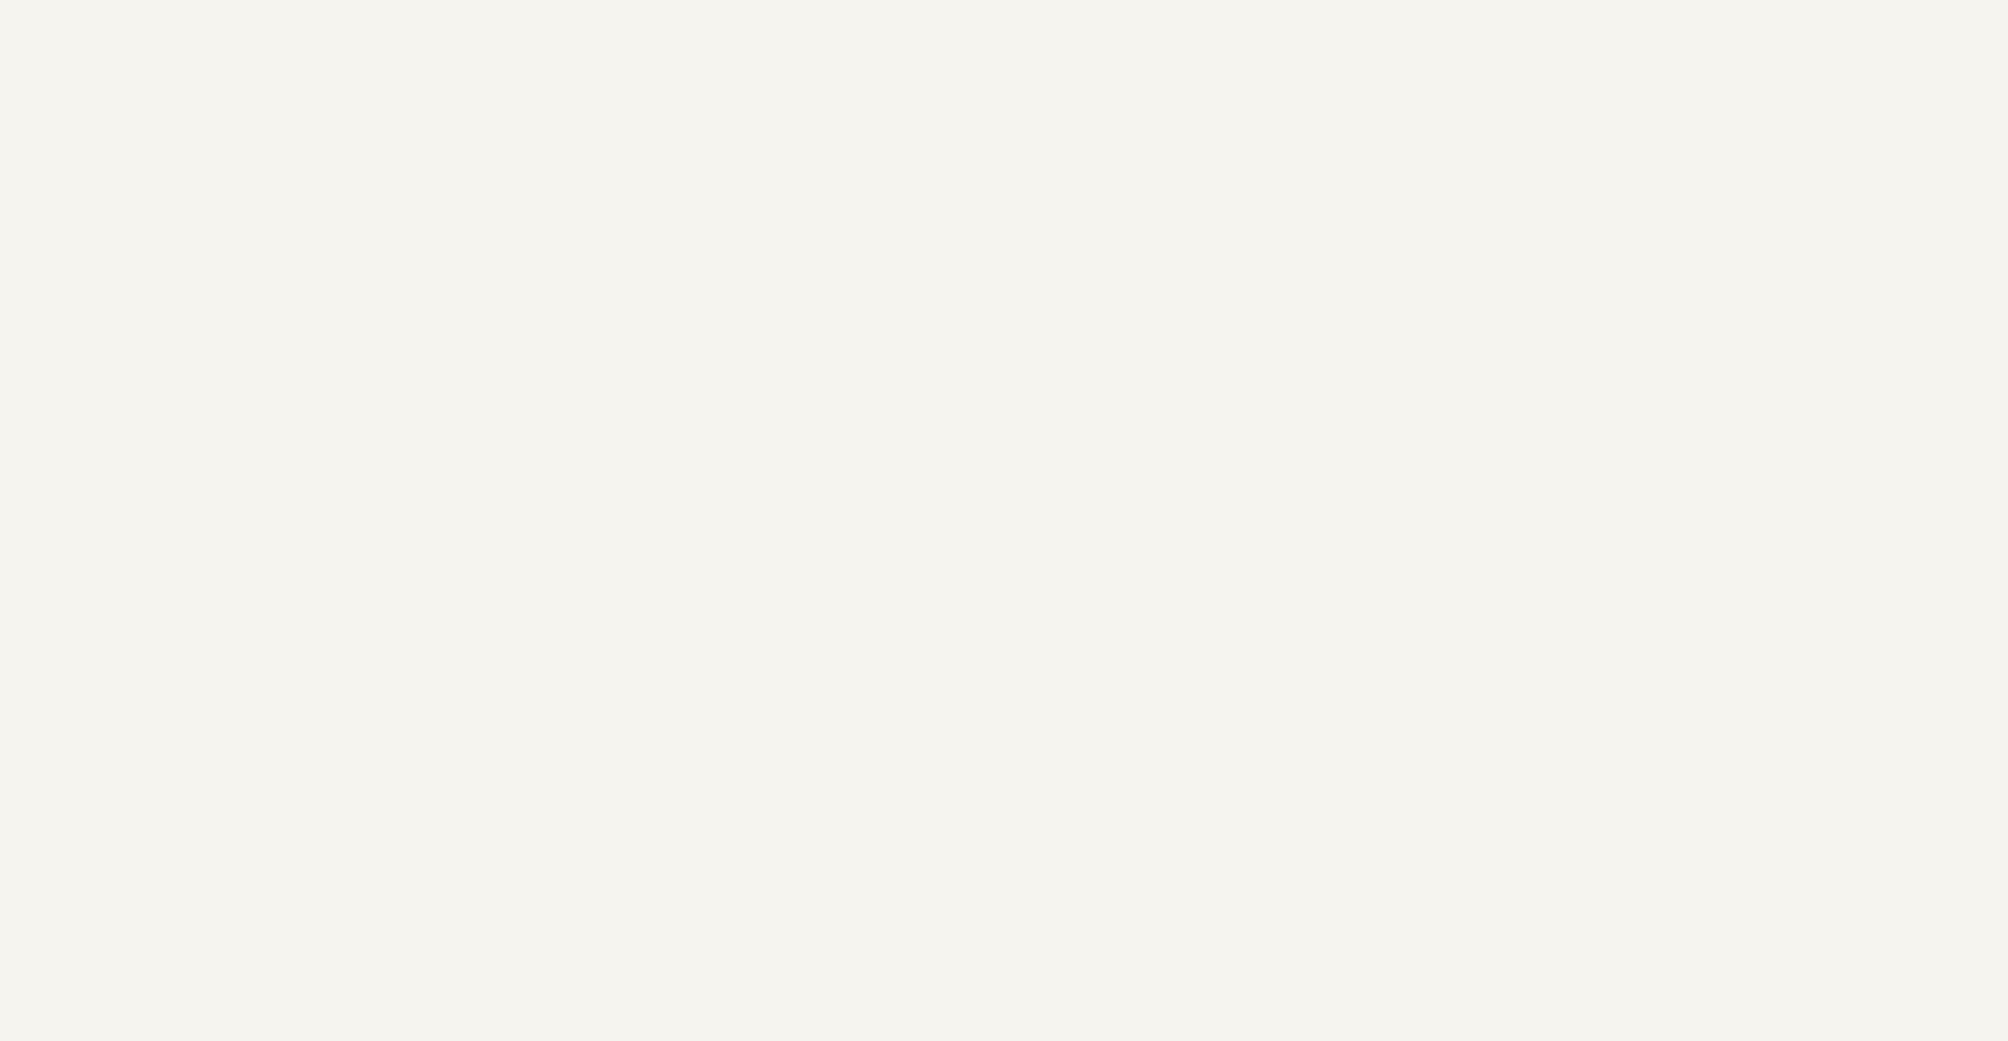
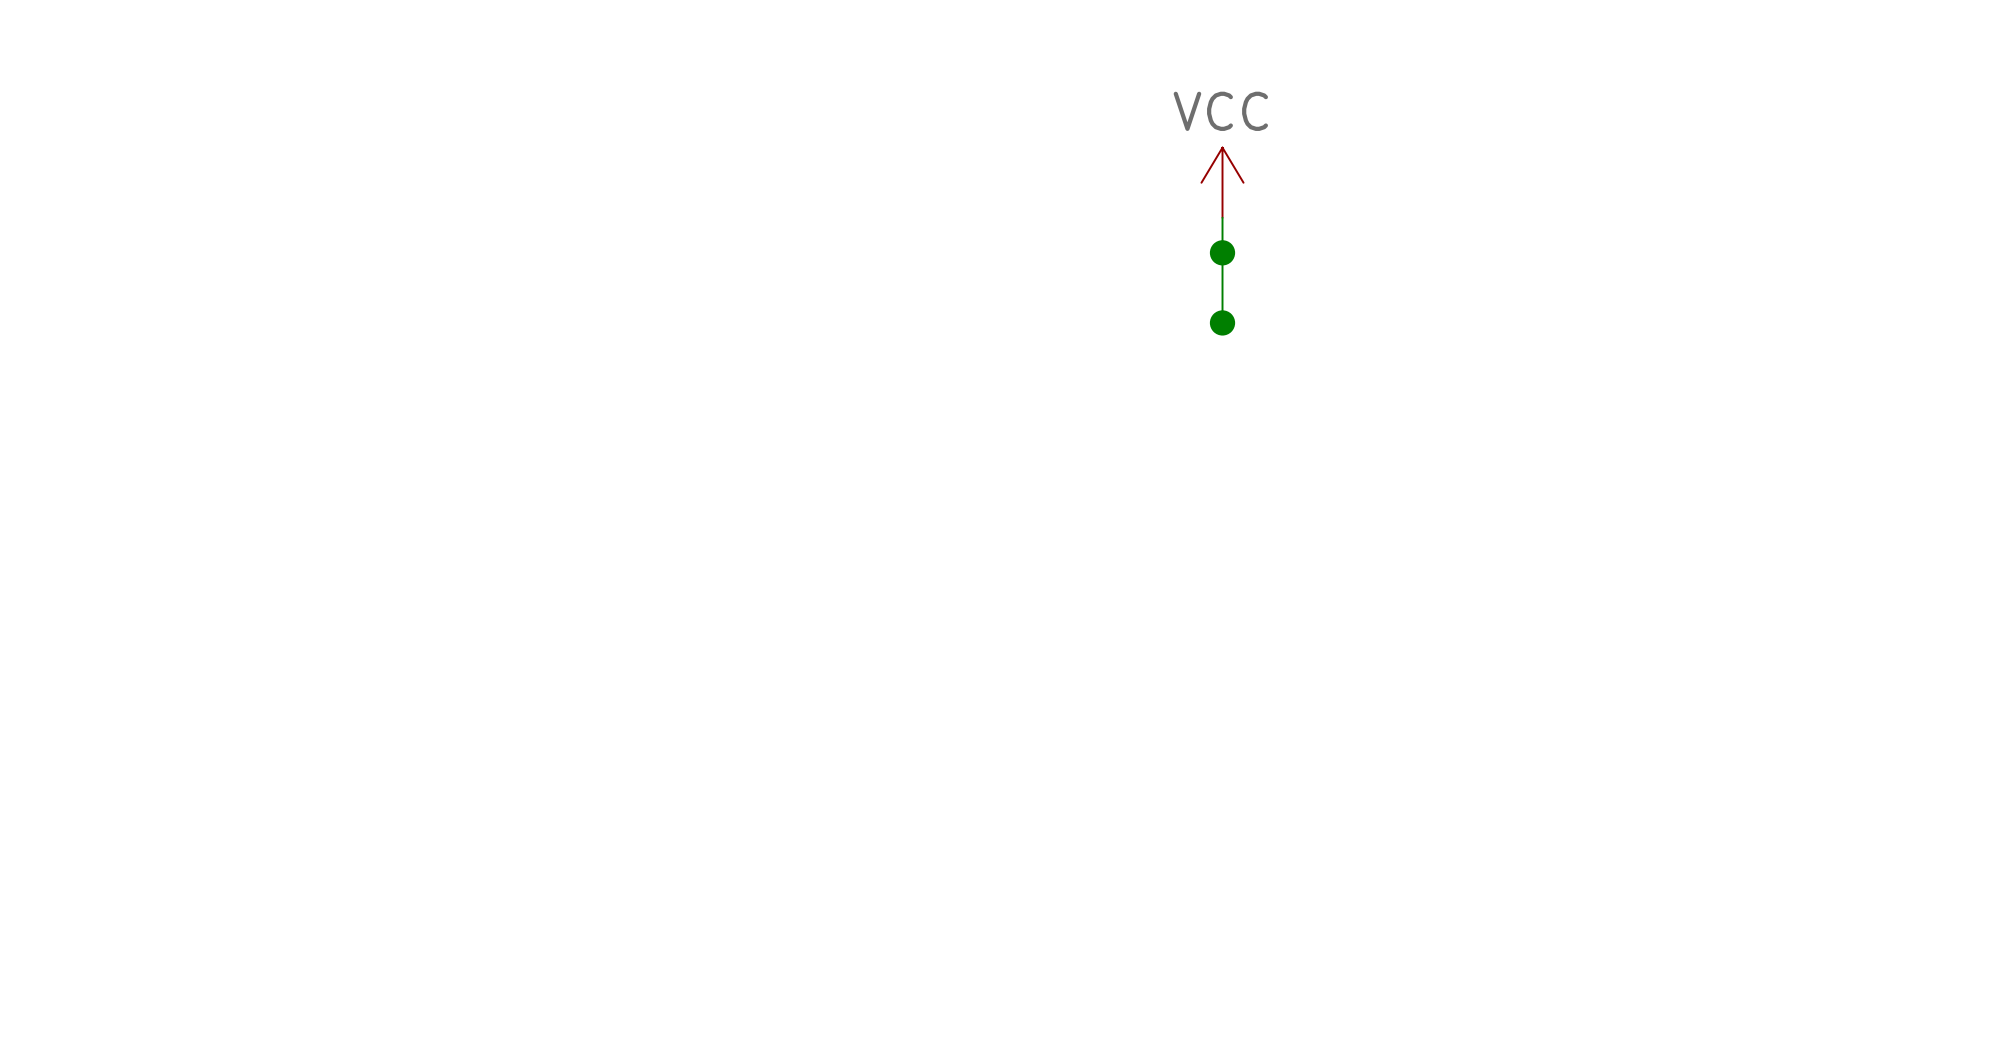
power symbol: none -> VCC (1222, 182)
wire: none -> (1222, 217) (1222, 322)
junction: none -> (1222, 252)
junction: none -> (1222, 322)

